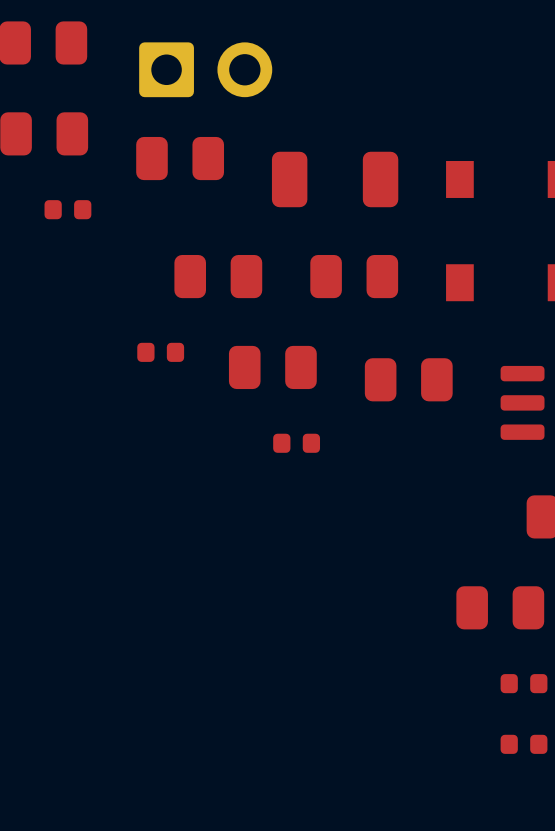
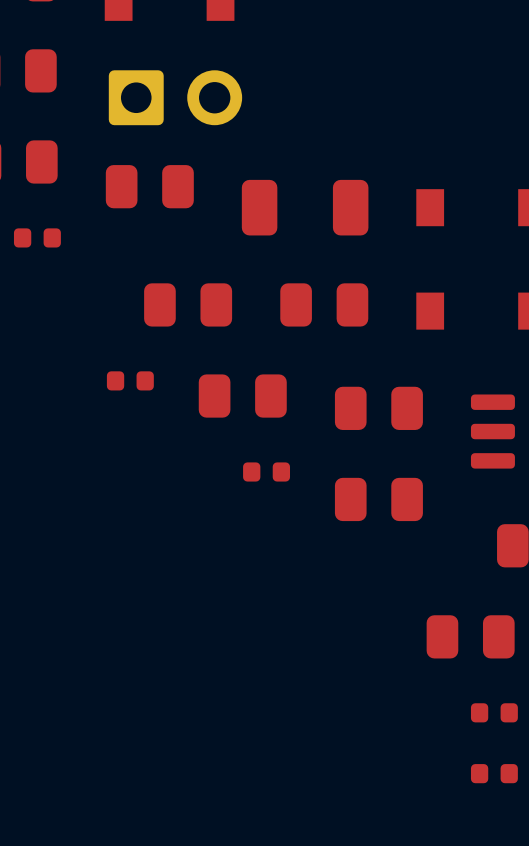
part: none -> (378, 499)

